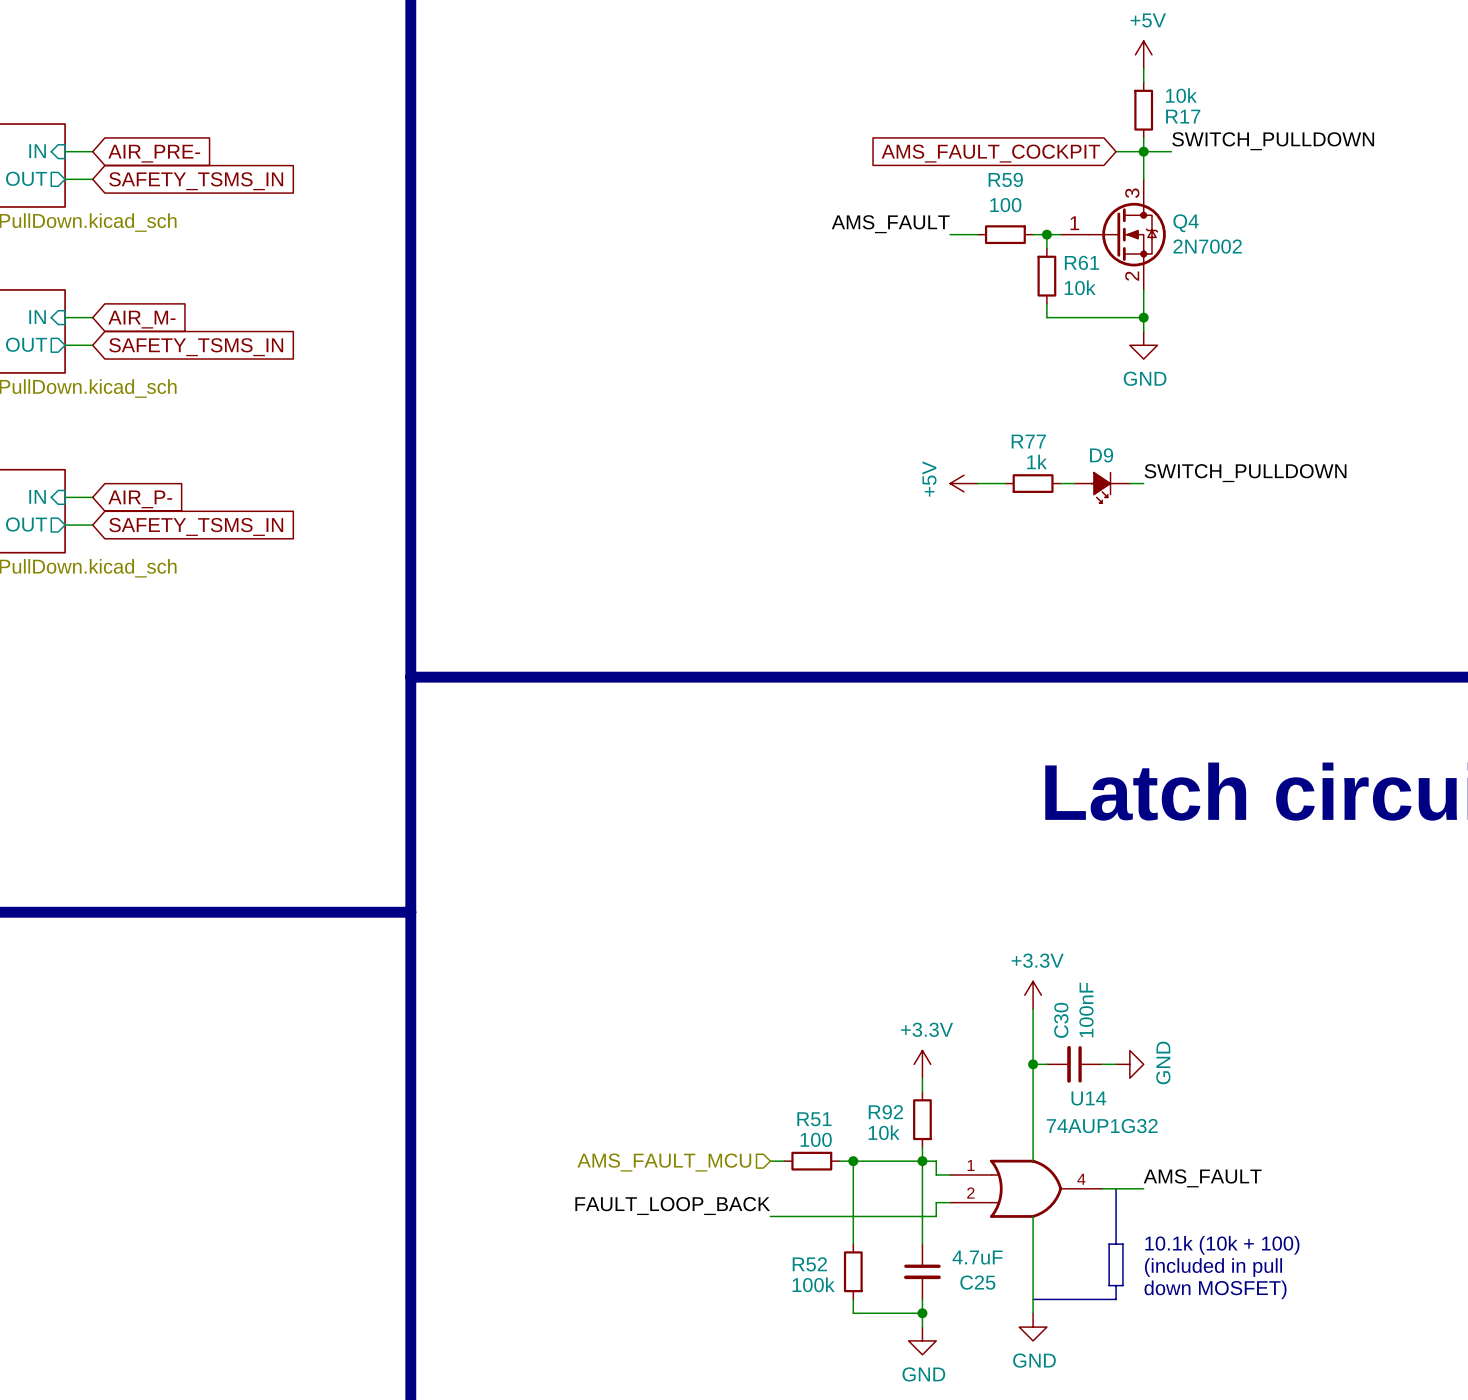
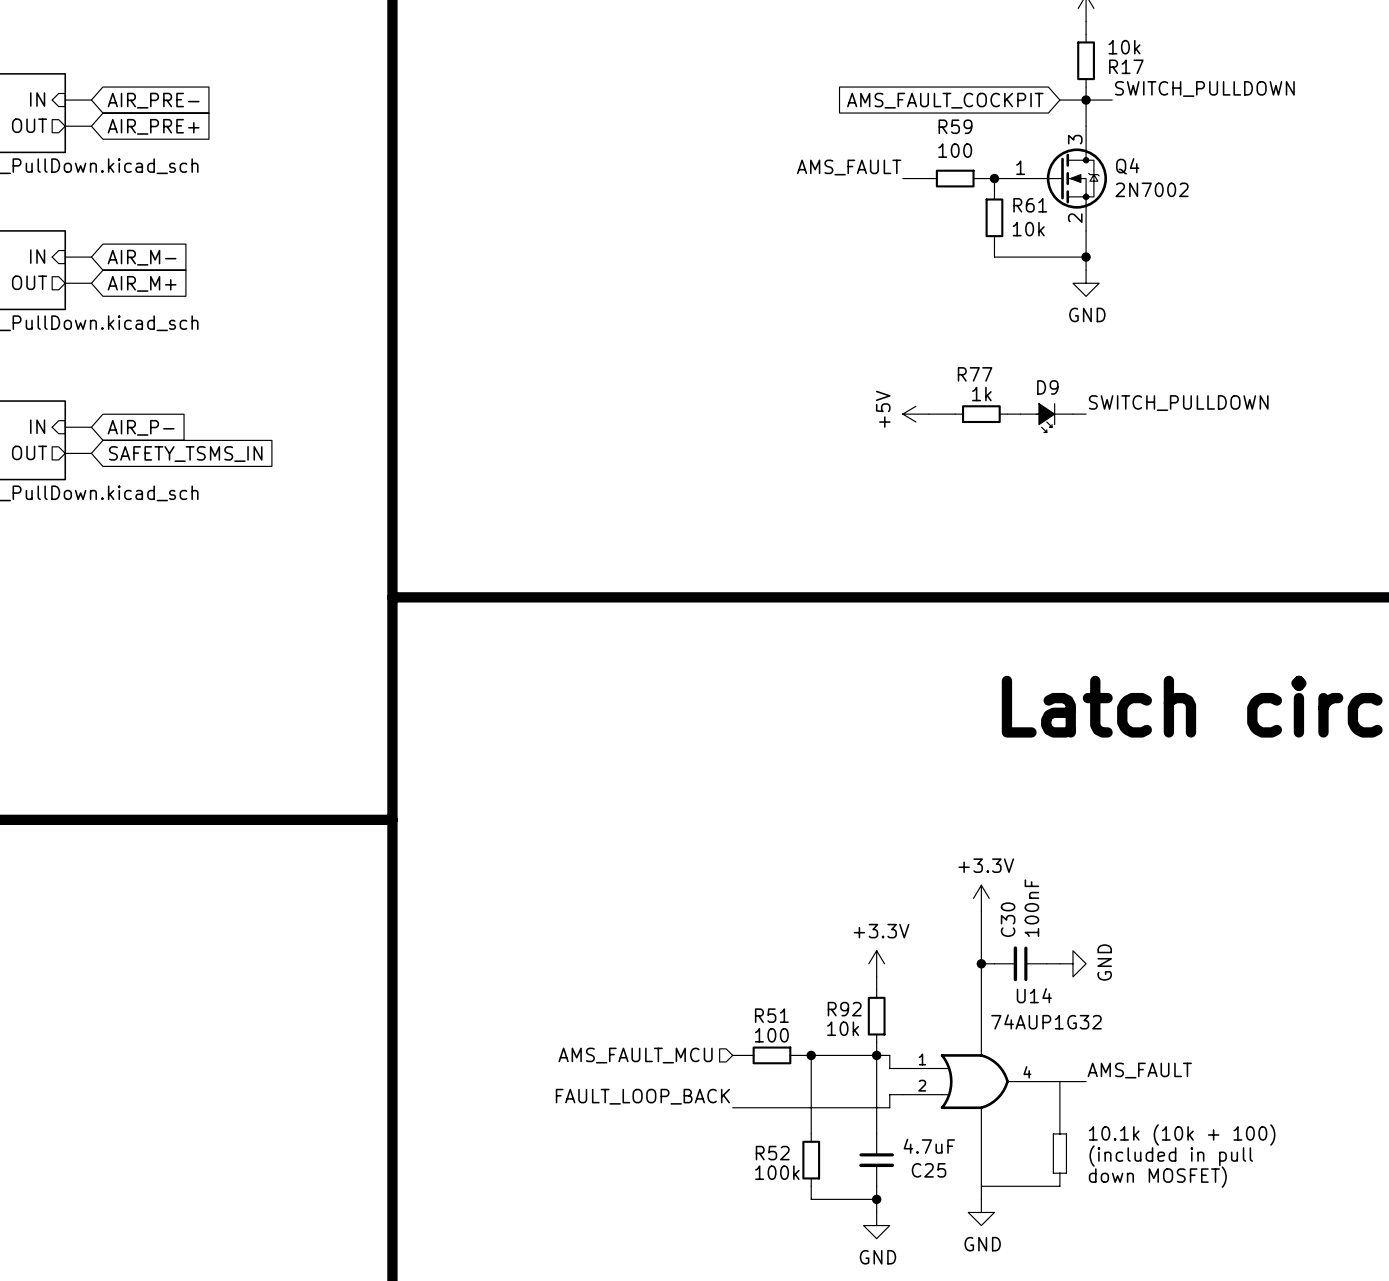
global label: SAFETY_TSMS_IN (196, 181) -> AIR_PRE+ (153, 126)
global label: SAFETY_TSMS_IN (196, 347) -> AIR_M+ (142, 283)

